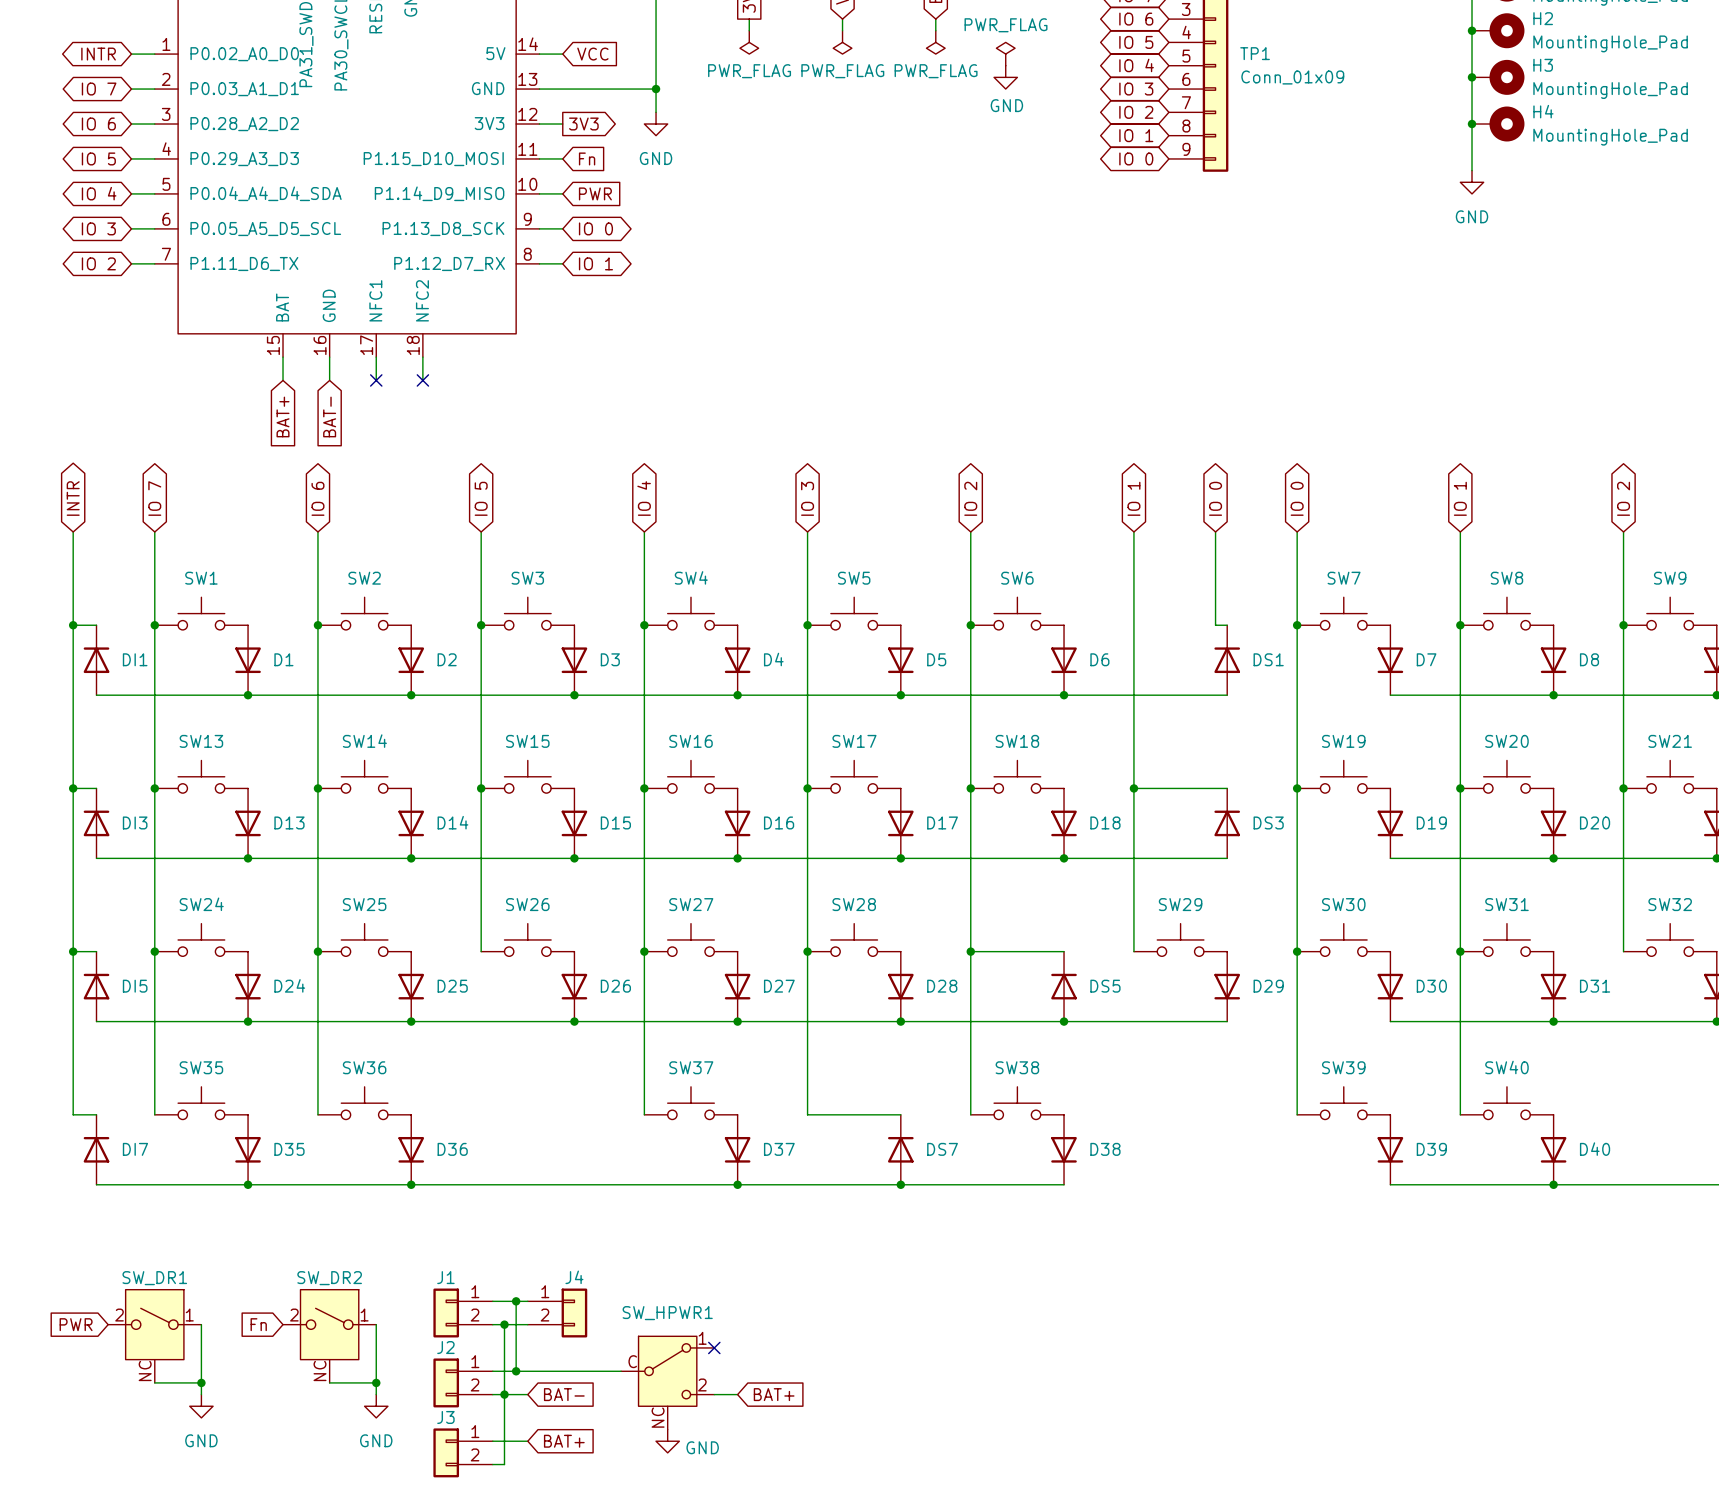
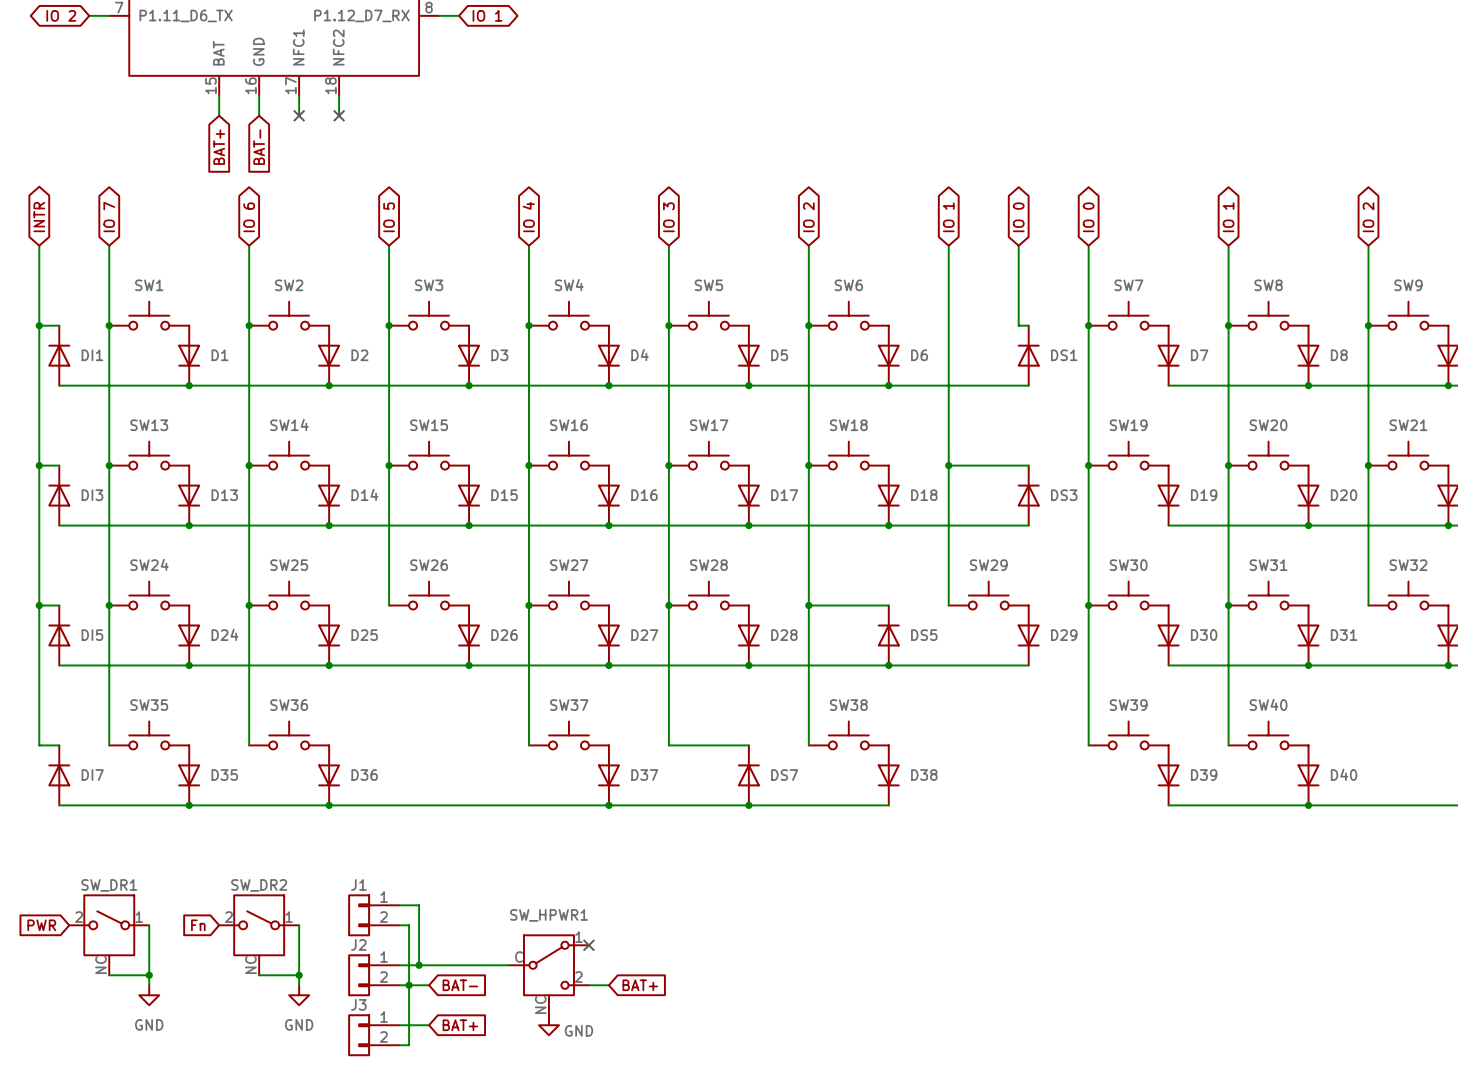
wire: (516, 1301) (527, 1301) -> none
junction: (516, 1301) -> none
J4: (557, 1313) -> none
wire: (504, 1324) (527, 1324) -> none
junction: (504, 1324) -> none

